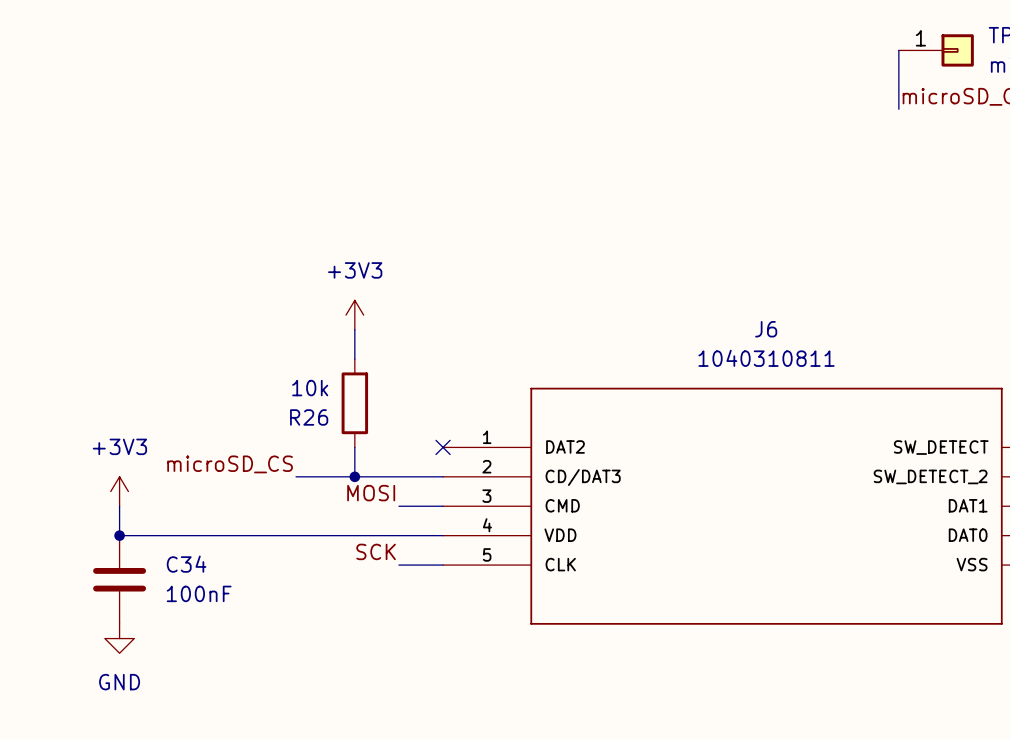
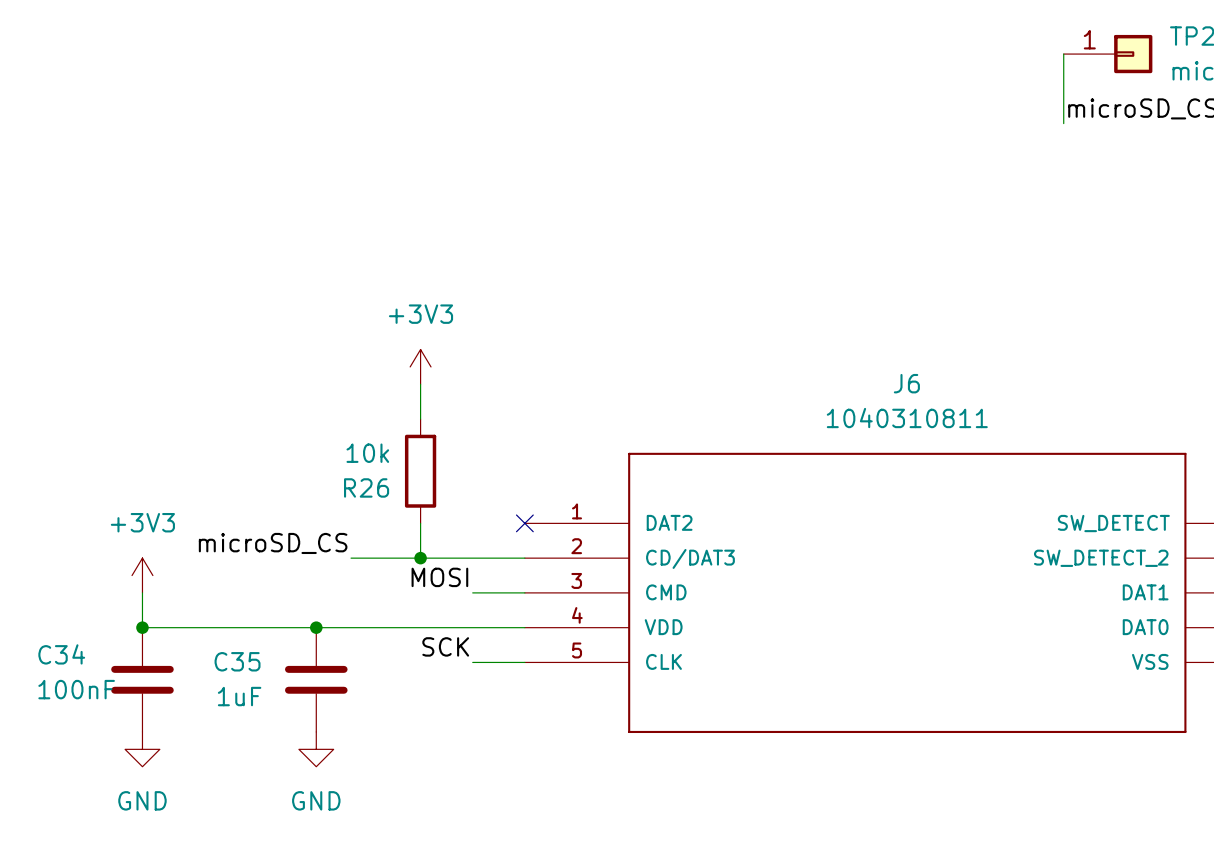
junction: none -> (316, 627)
C34 name position: C34 (186, 564) -> C34 (61, 654)
C35: none -> 1uF (316, 679)
C34 value position: 100nF (199, 593) -> 100nF (76, 689)
power symbol: none -> GND (316, 749)

